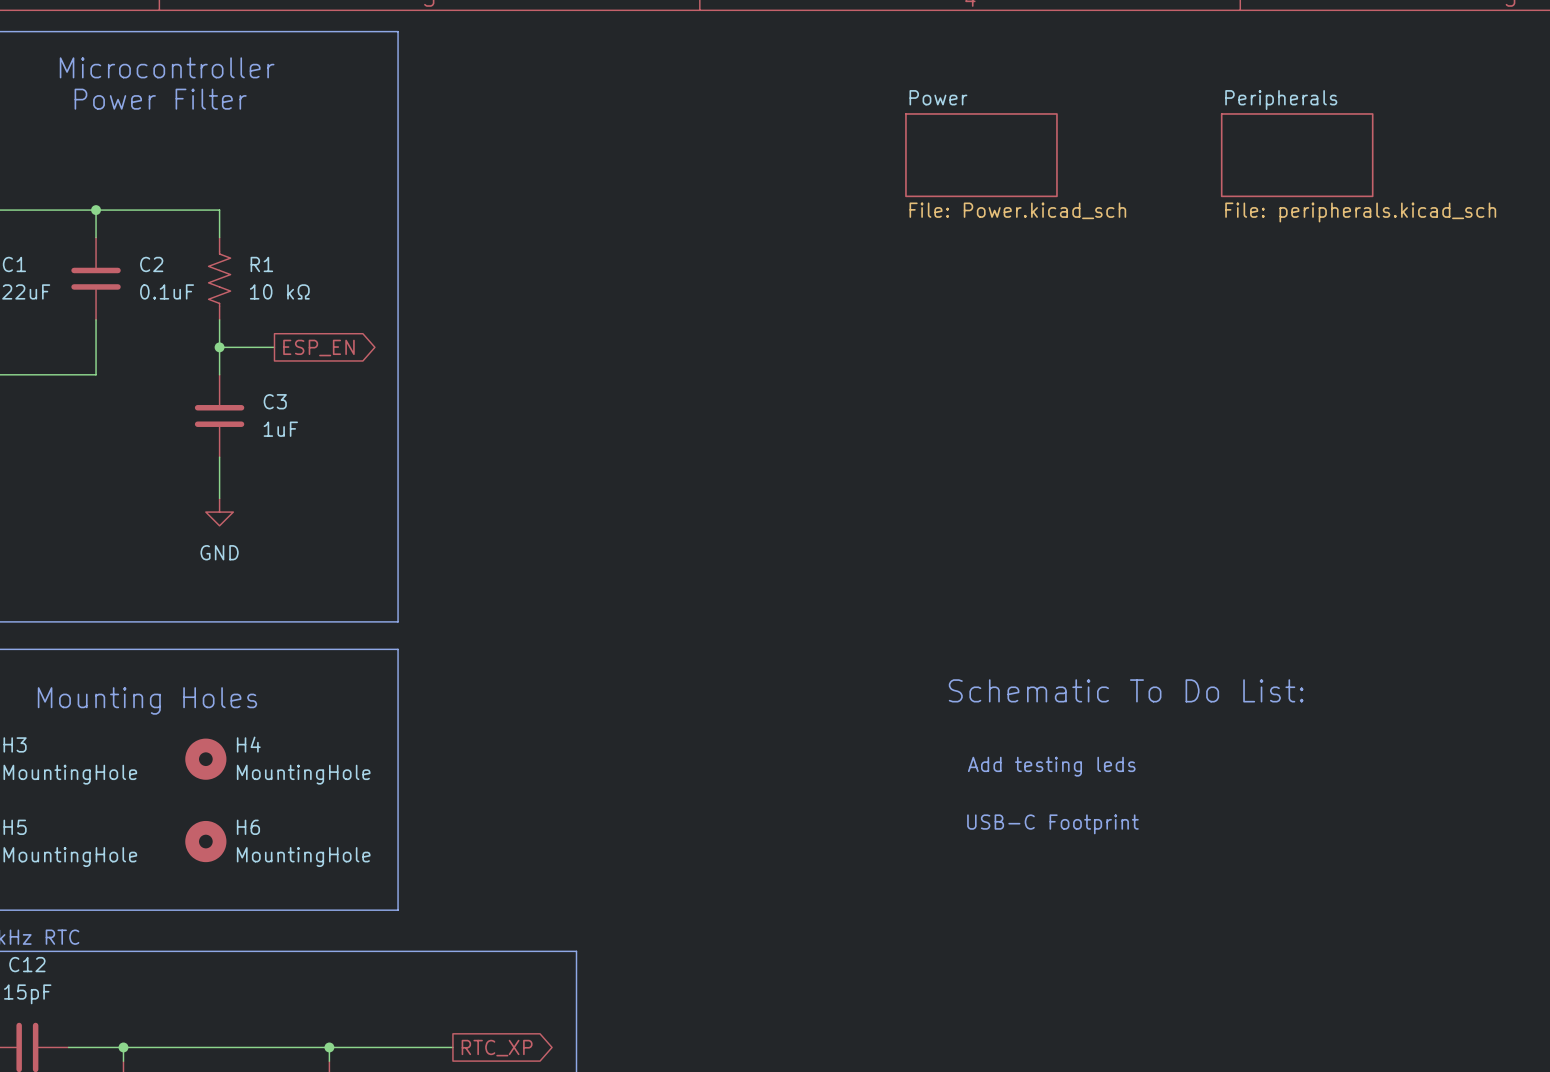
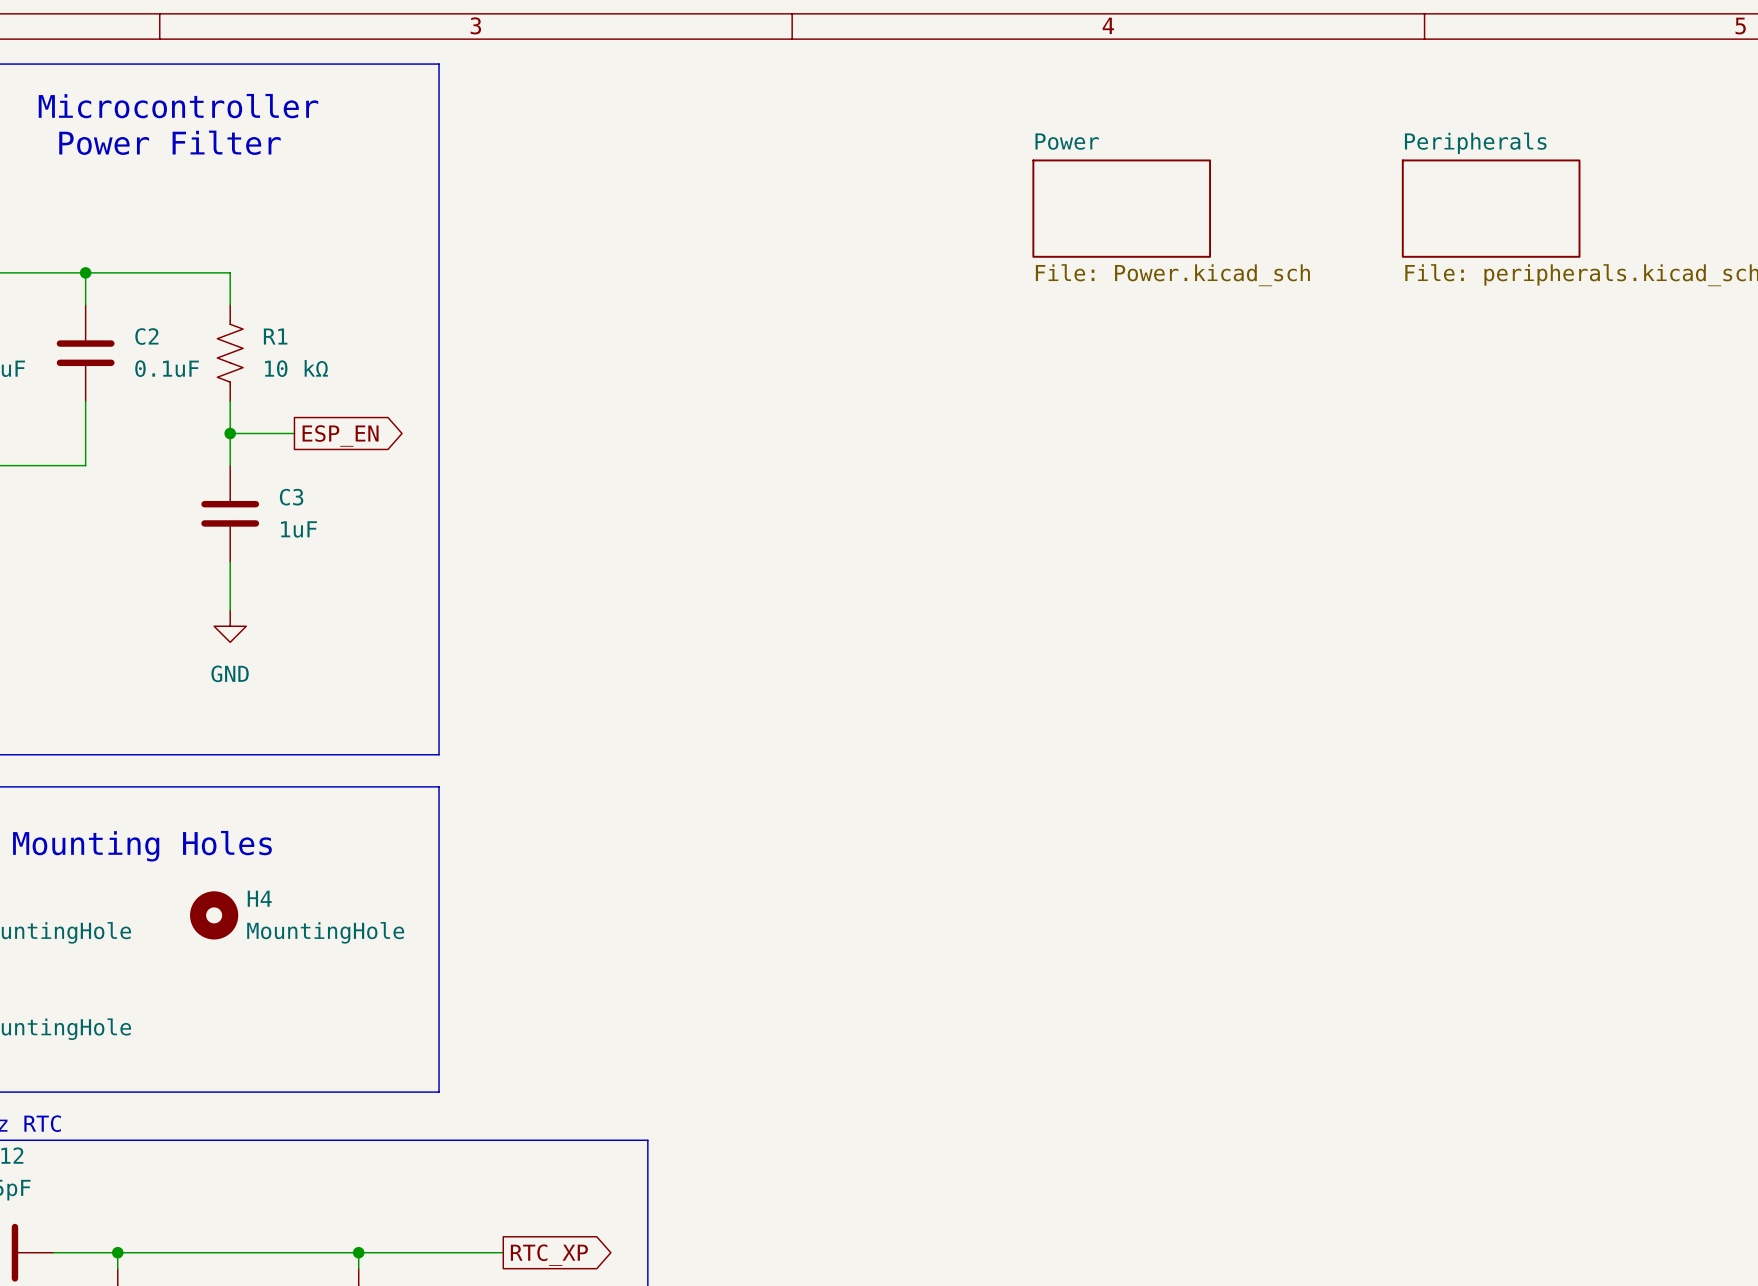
text: Schematic To Do List: (1126, 690) -> none
text: Add testing leds (1051, 766) -> none
text: USB-C Footprint (1052, 824) -> none
H6: MountingHole (205, 841) -> none

